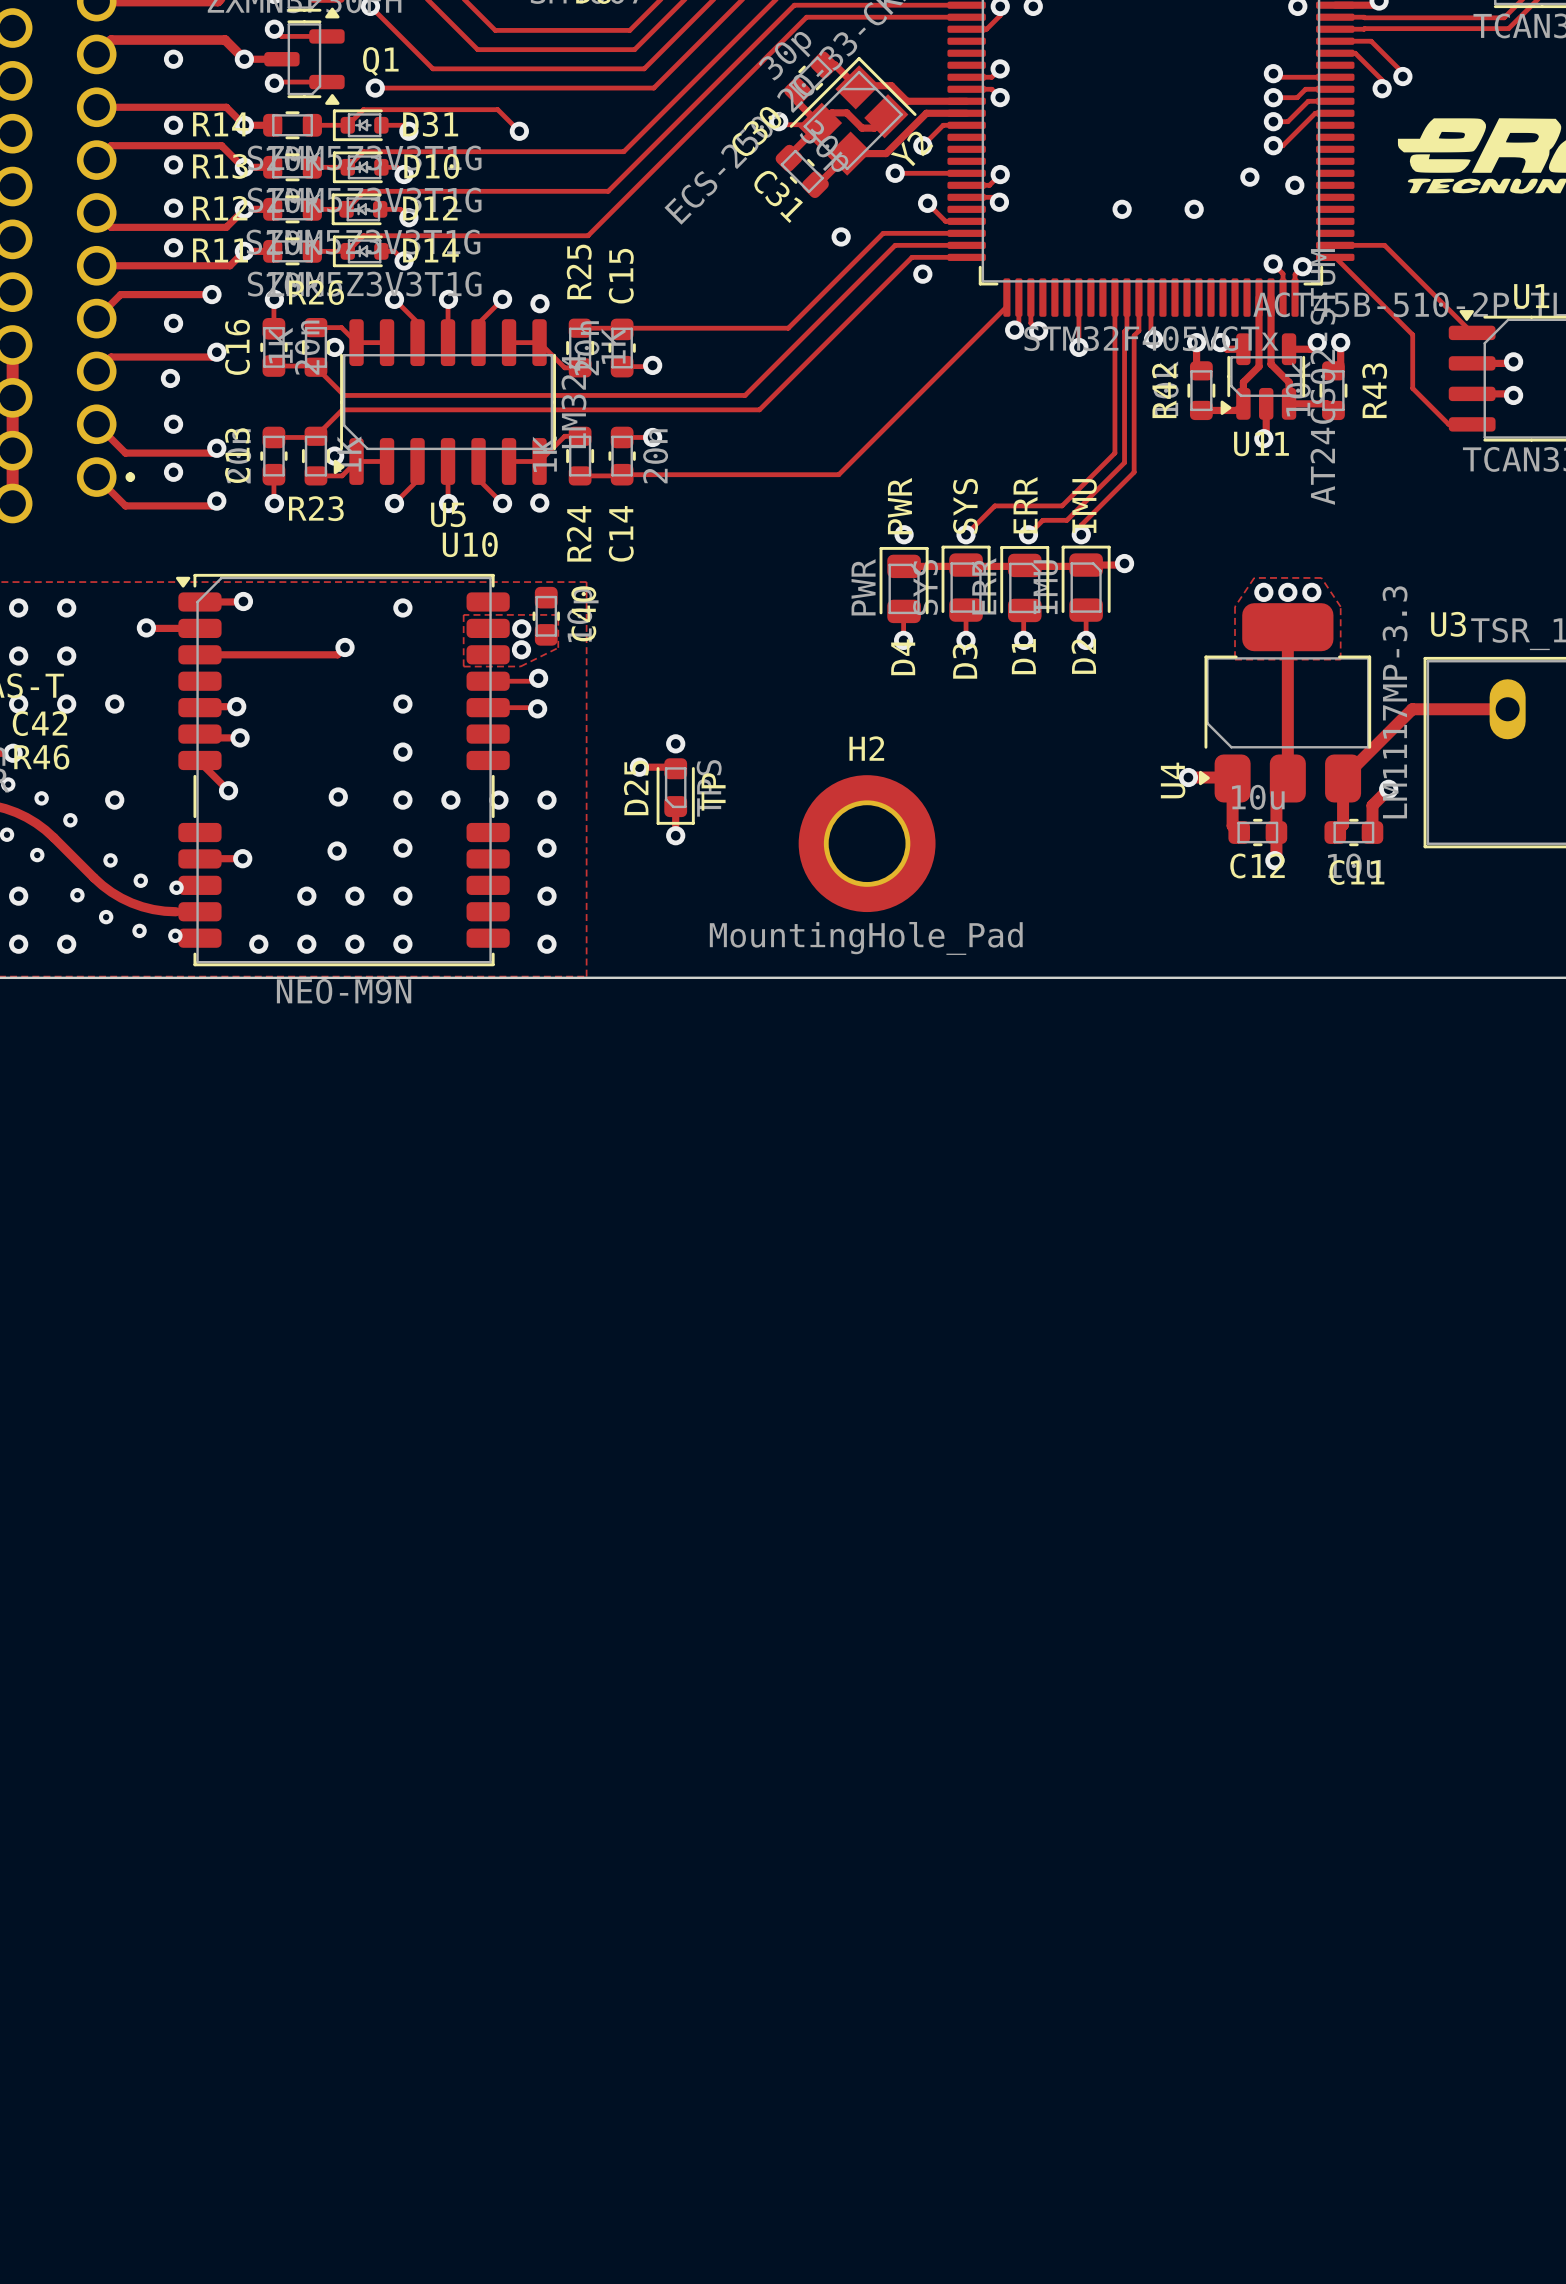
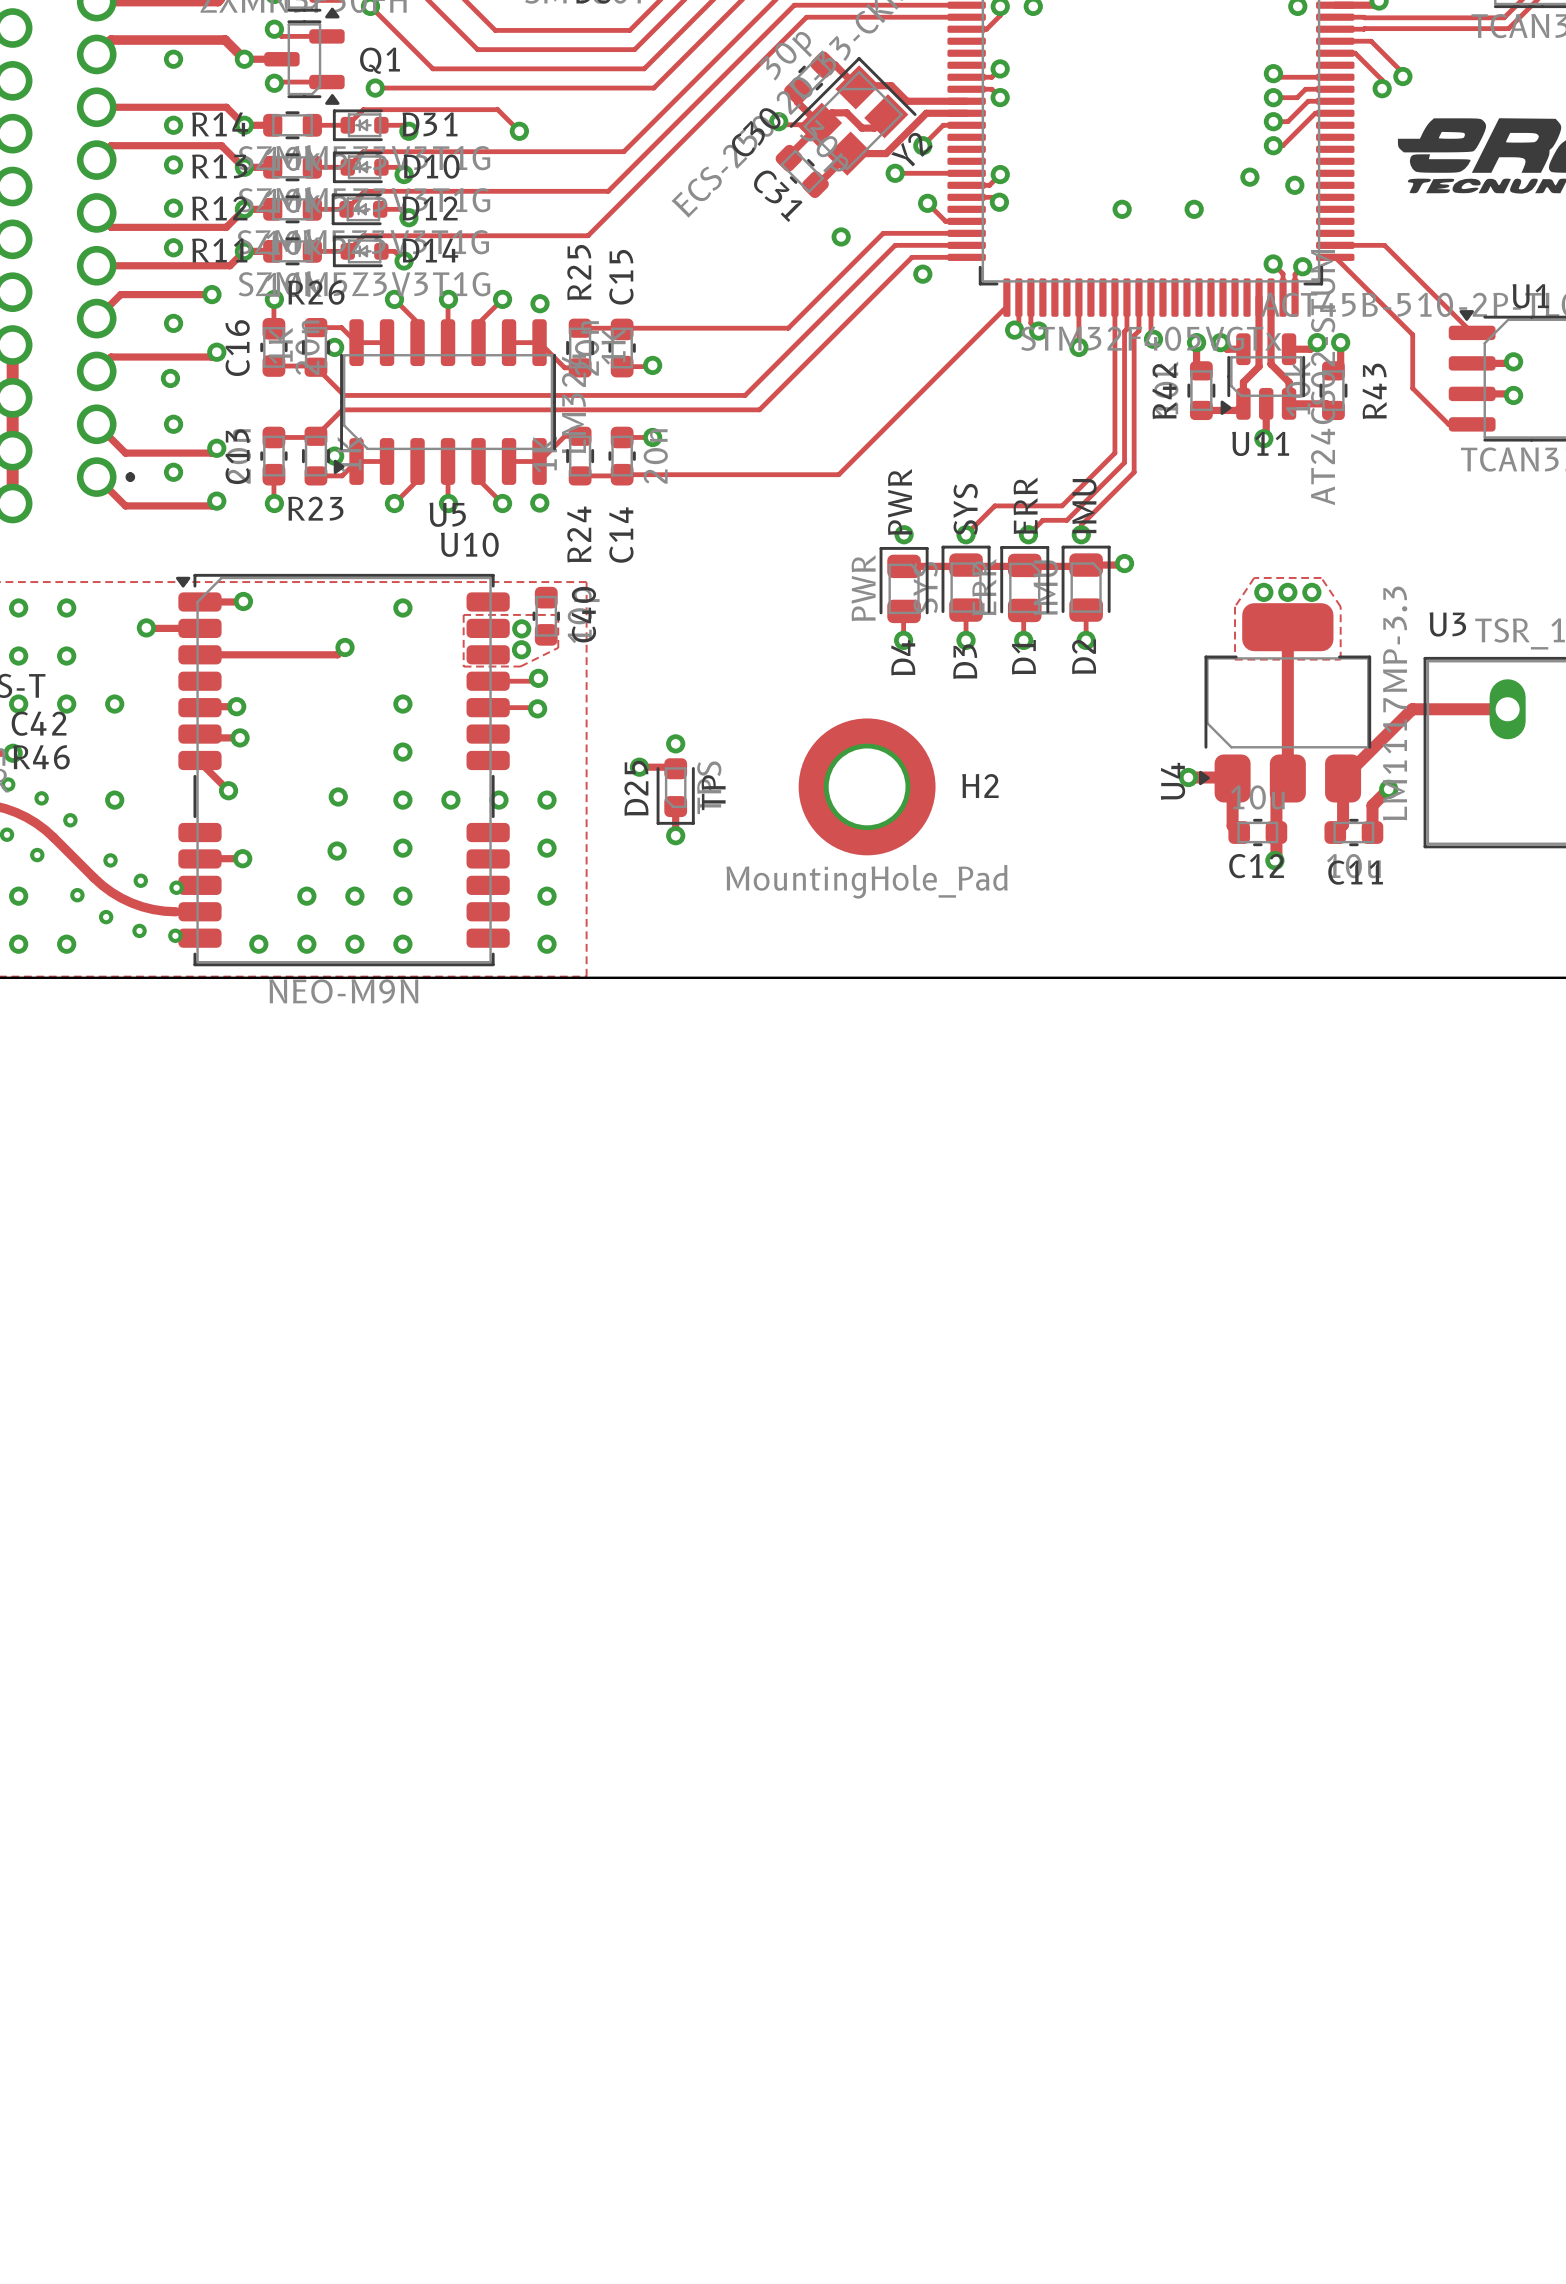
H2 name position: H2 (866, 748) -> H2 (980, 785)
H2 position: (867, 843) -> (867, 786)

